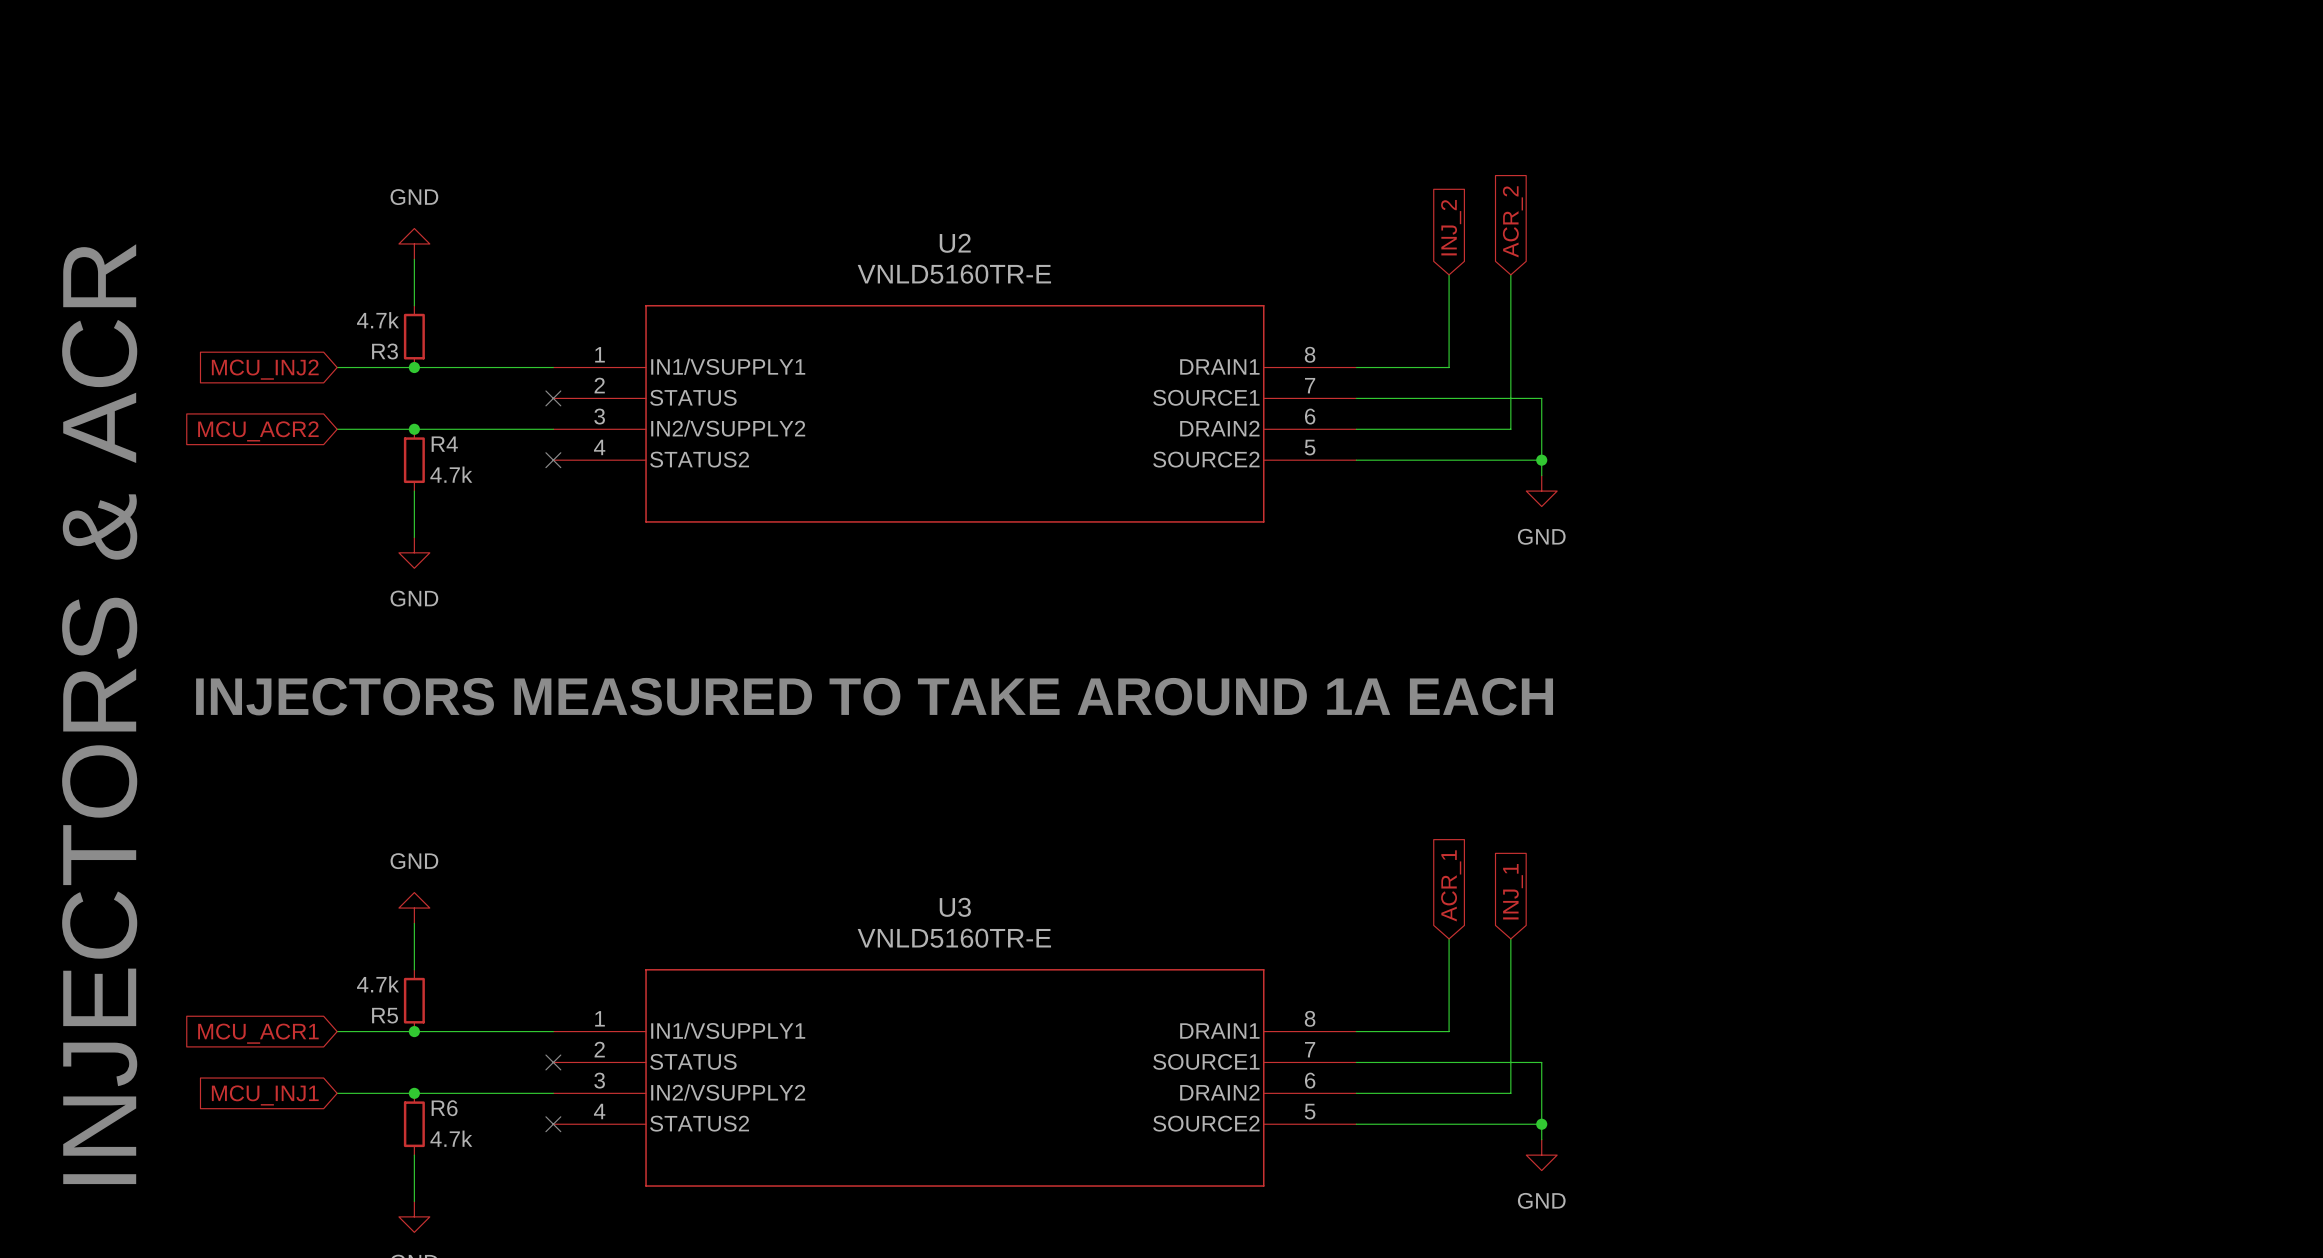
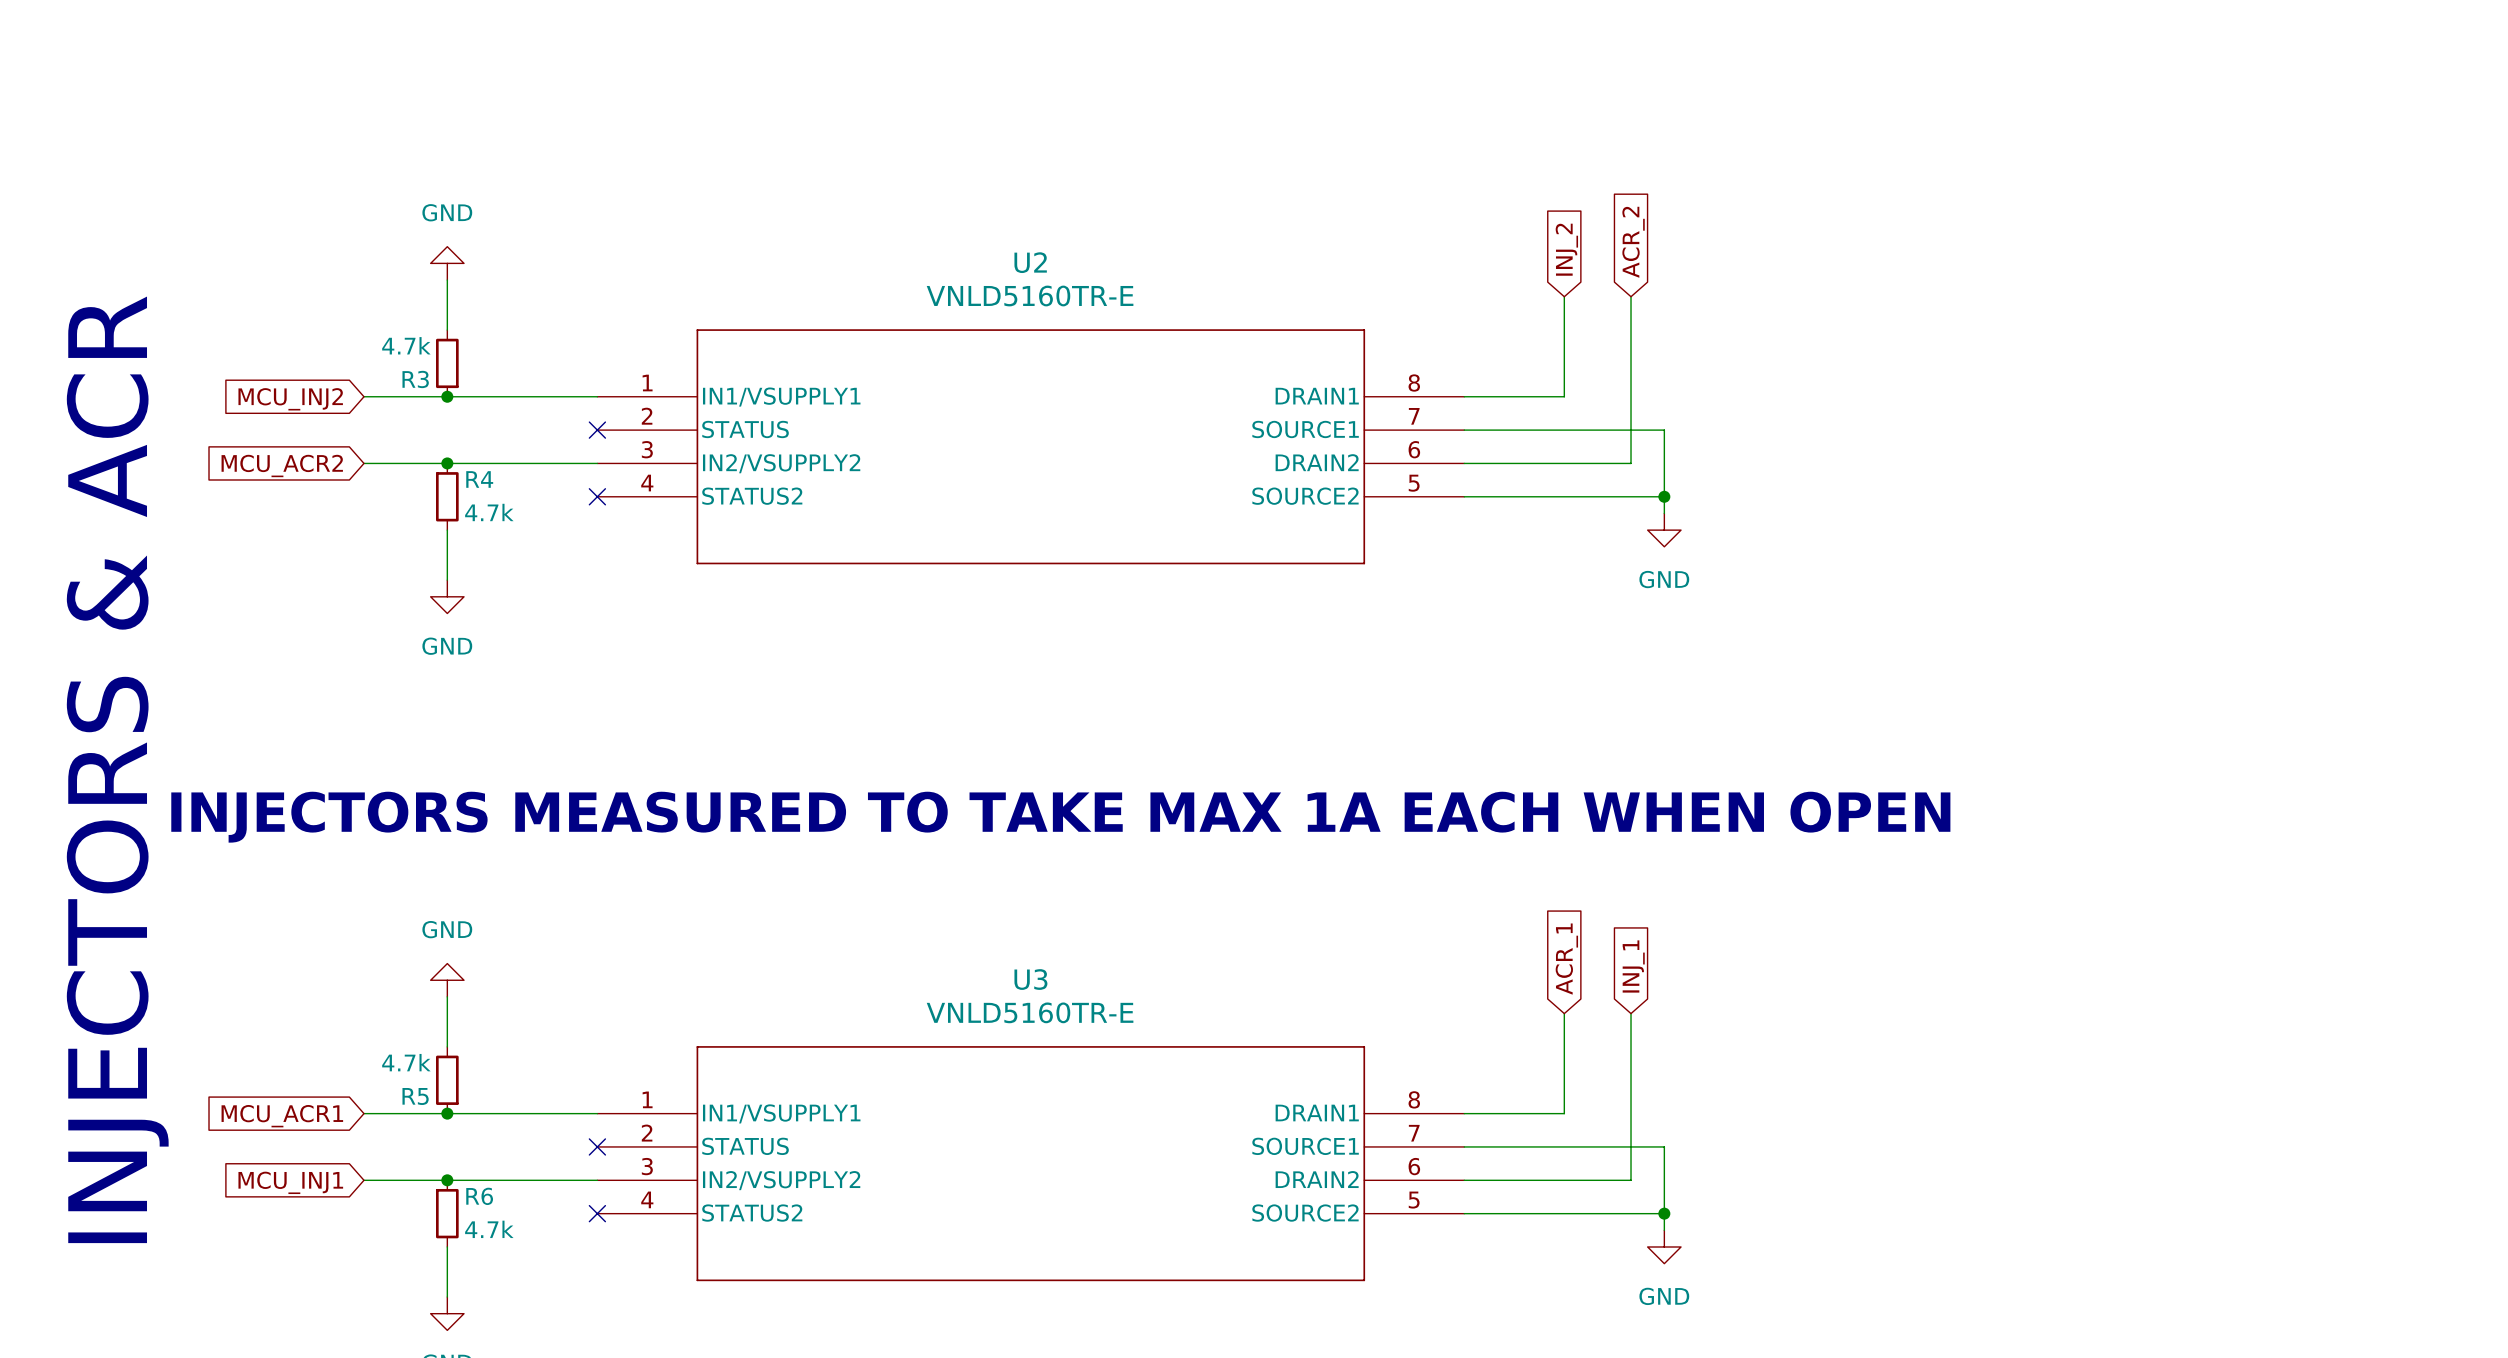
text: INJECTORS MEASURED TO TAKE AROUND 1A EACH (874, 696) -> INJECTORS MEASURED TO TAKE MAX 1A EACH WHEN OPEN (1060, 817)

